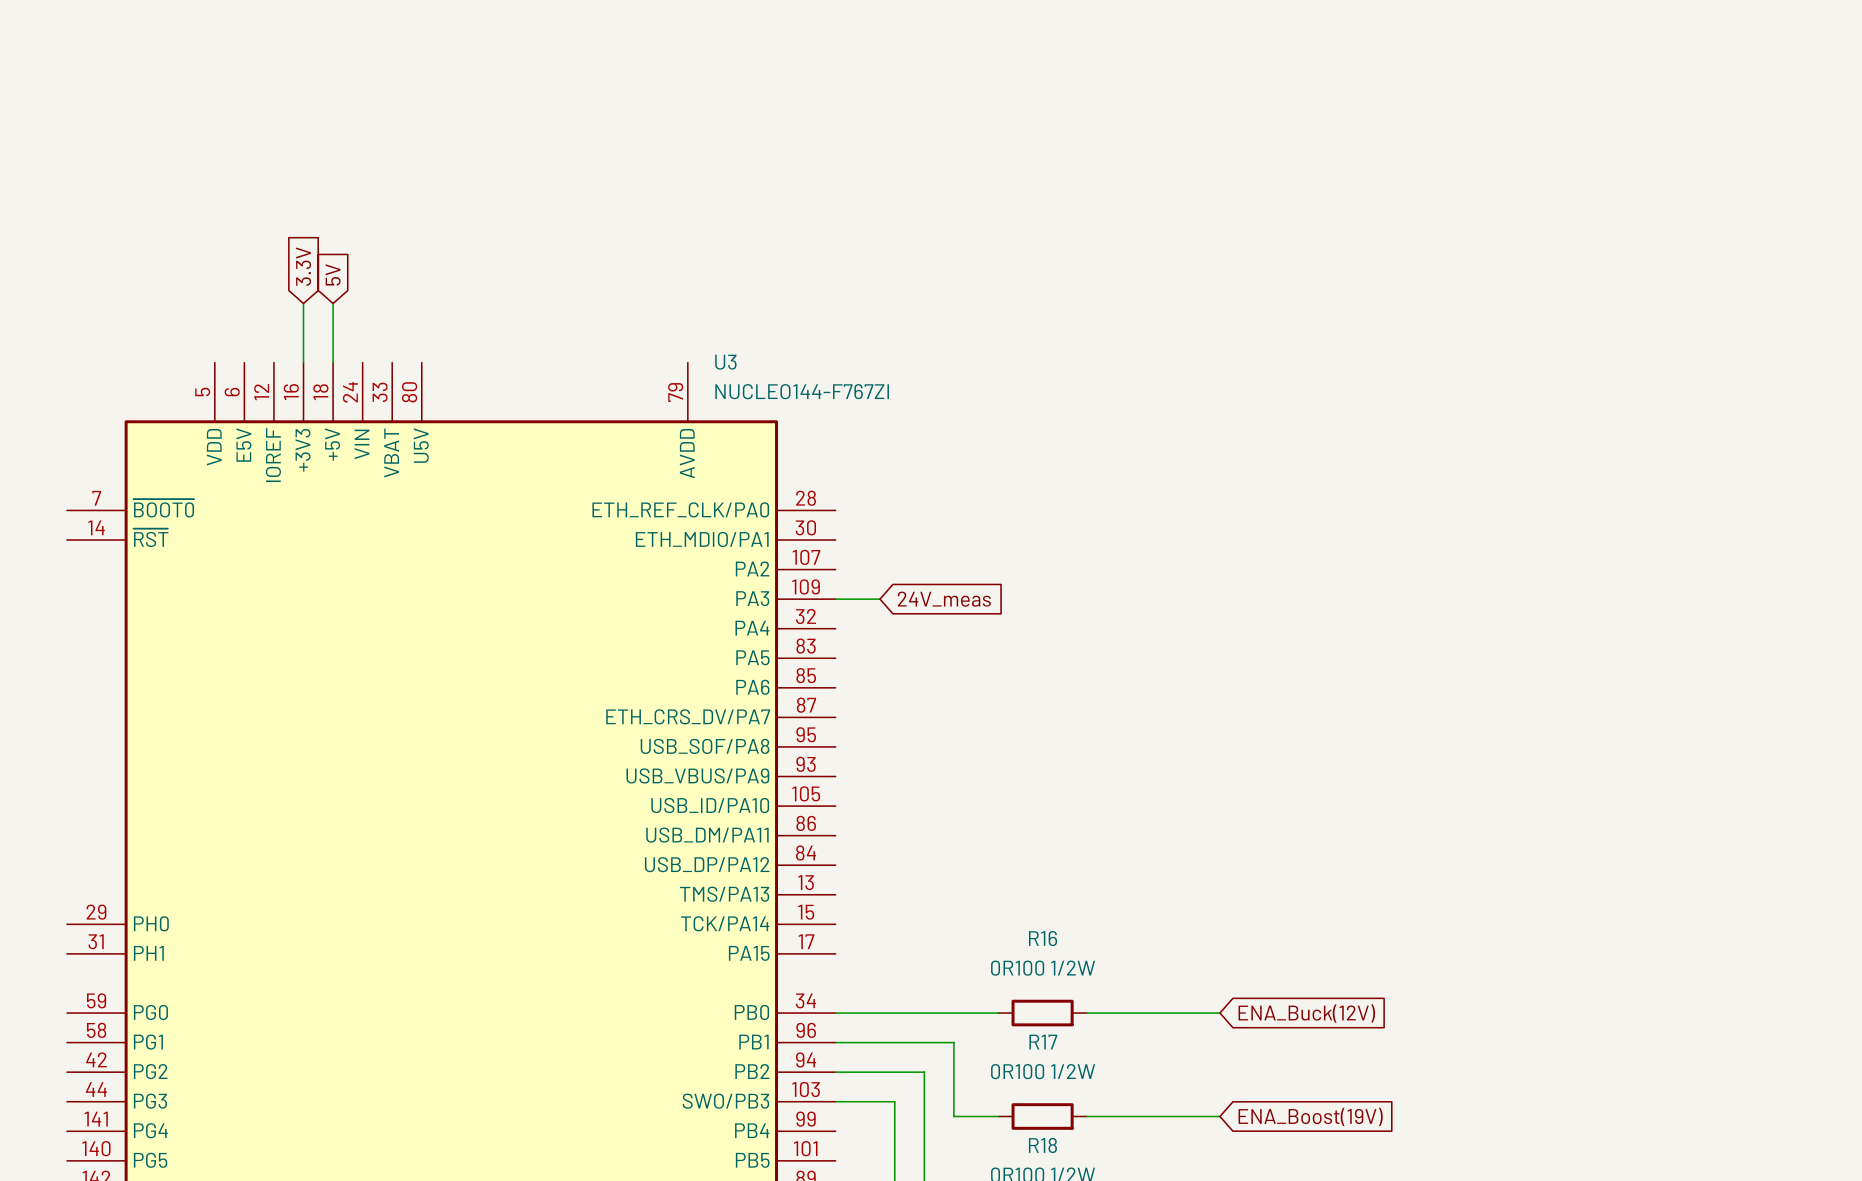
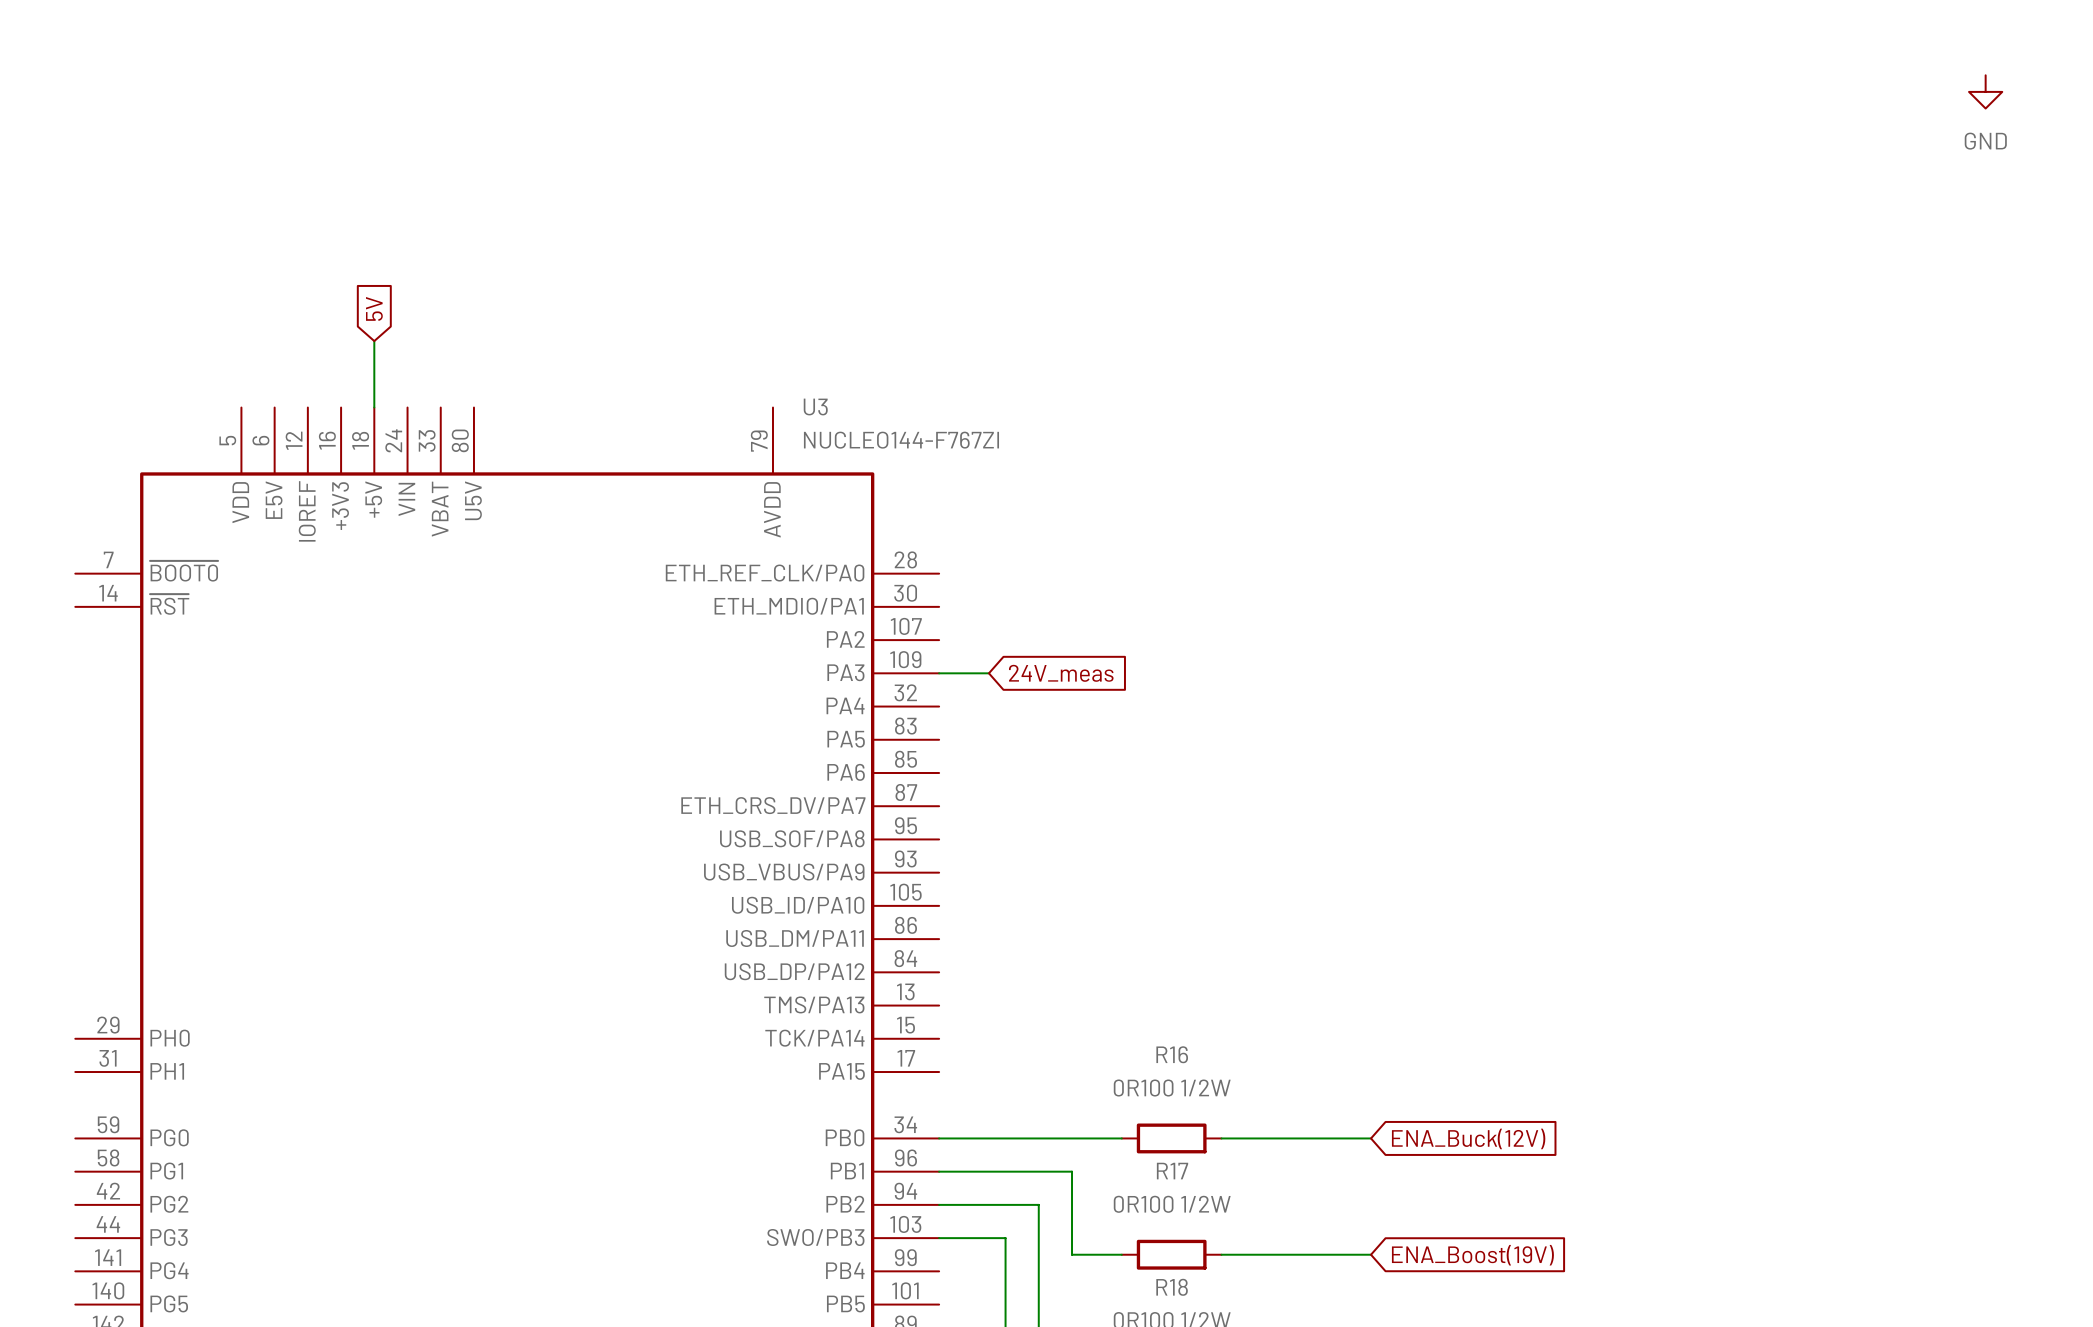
power symbol: none -> GND (1985, 91)
global label: 3.3V (303, 266) -> none
wire: (303, 303) (303, 362) -> none

